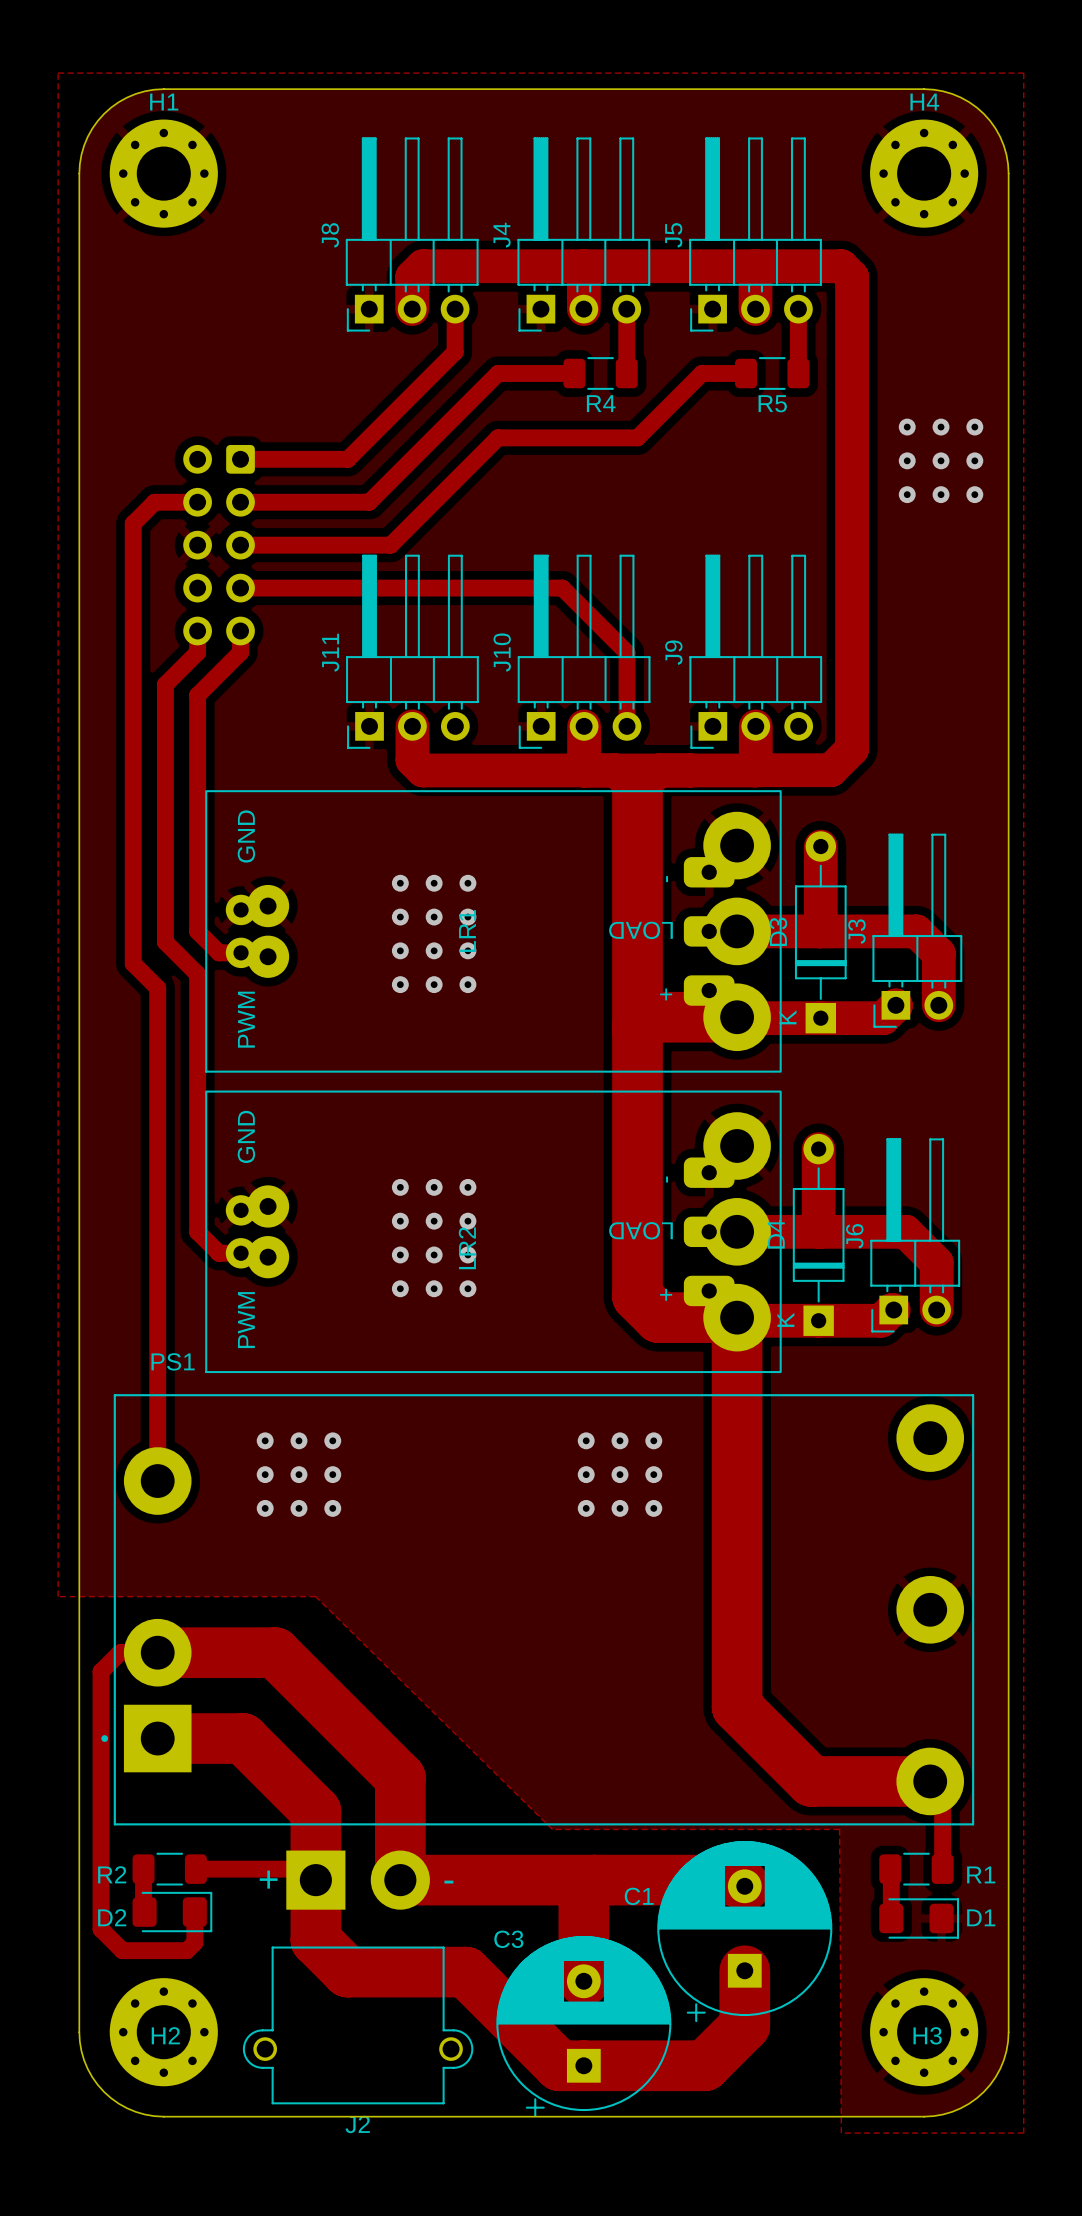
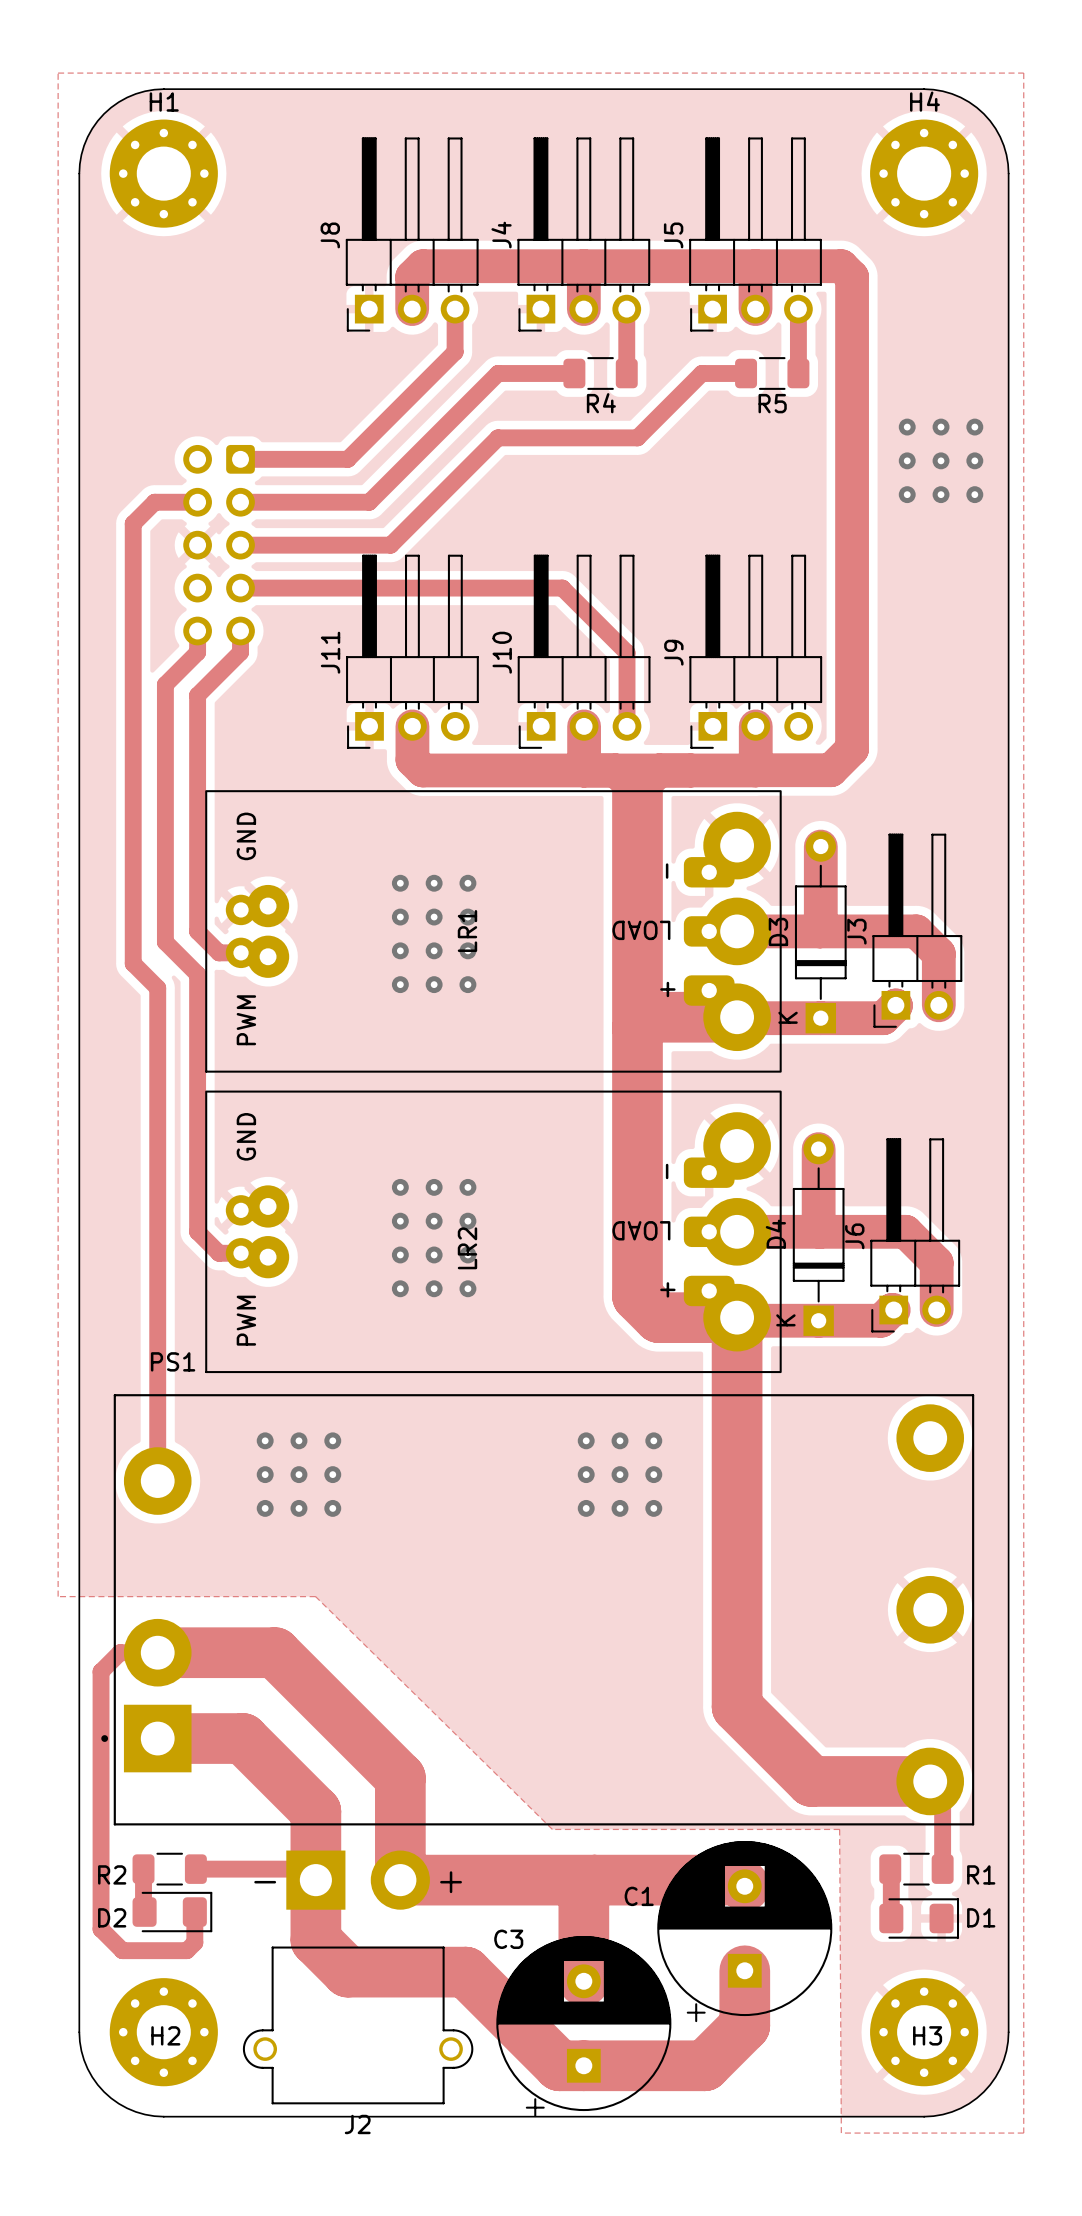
J2 text position: + (268, 1879) -> + (451, 1882)
J2 text position: - (448, 1882) -> - (265, 1882)

